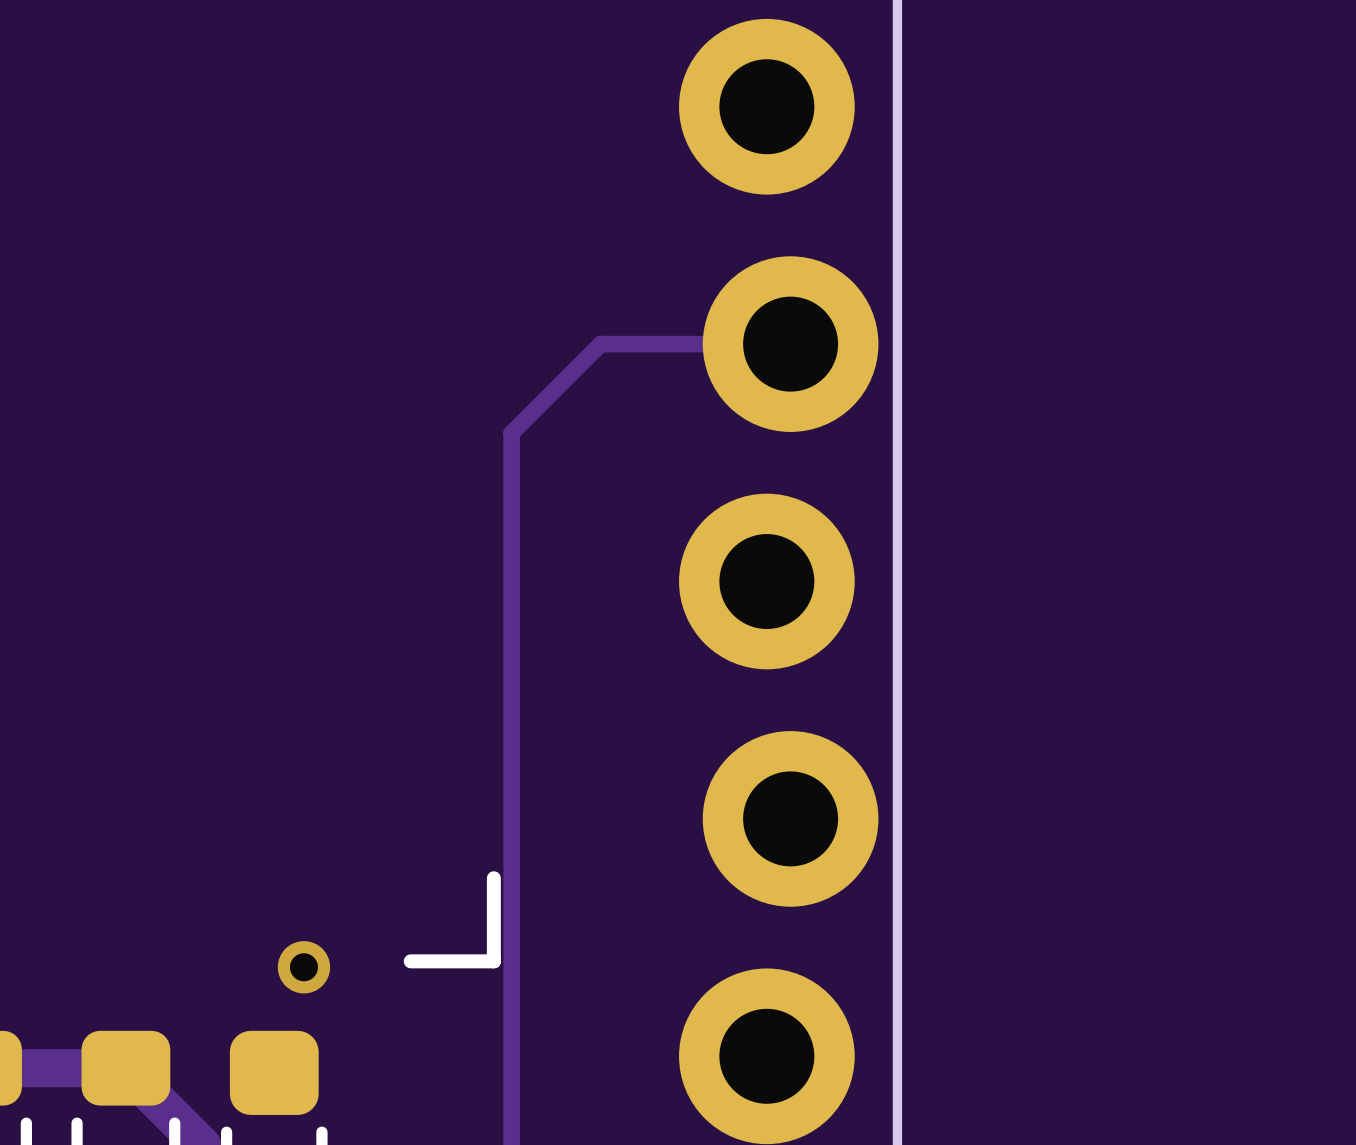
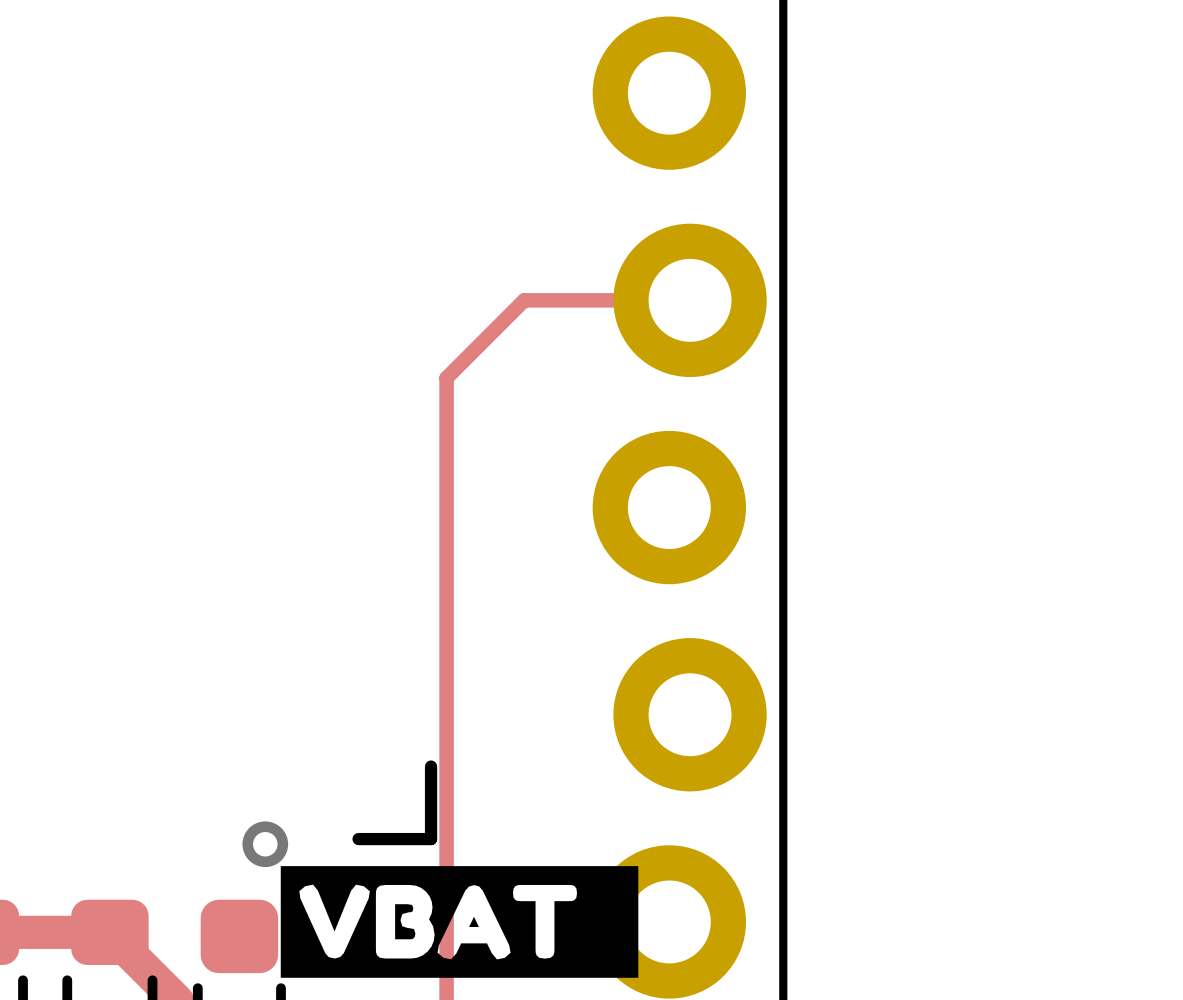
drawing: none -> [280, 866, 639, 978]

